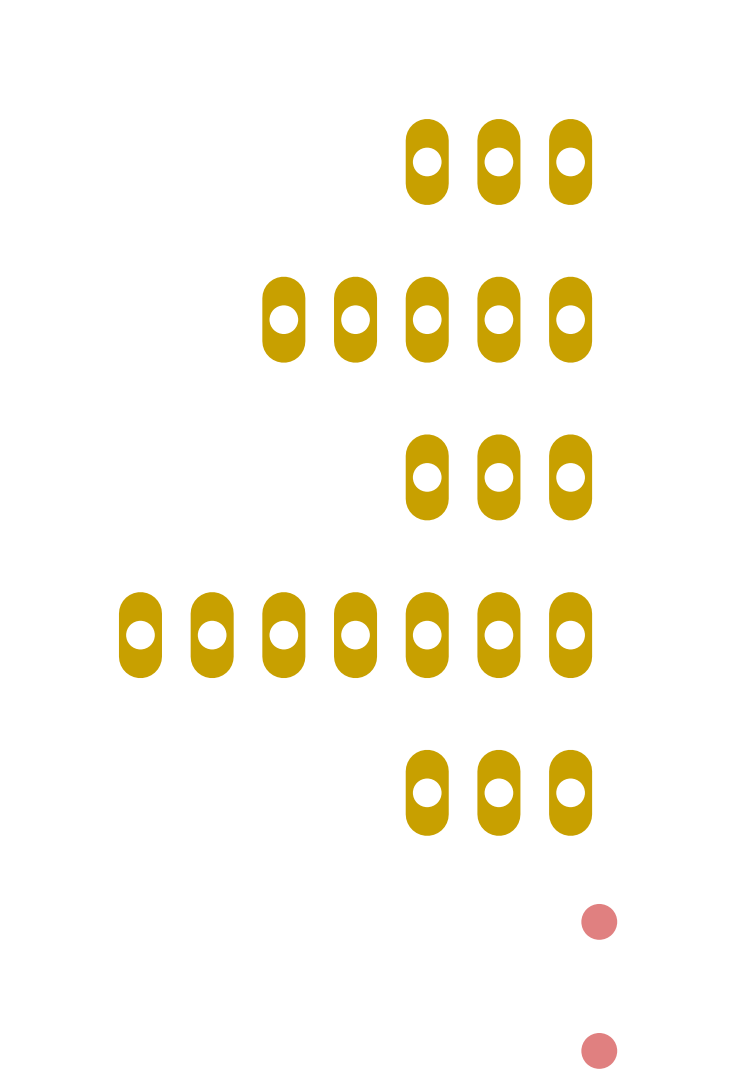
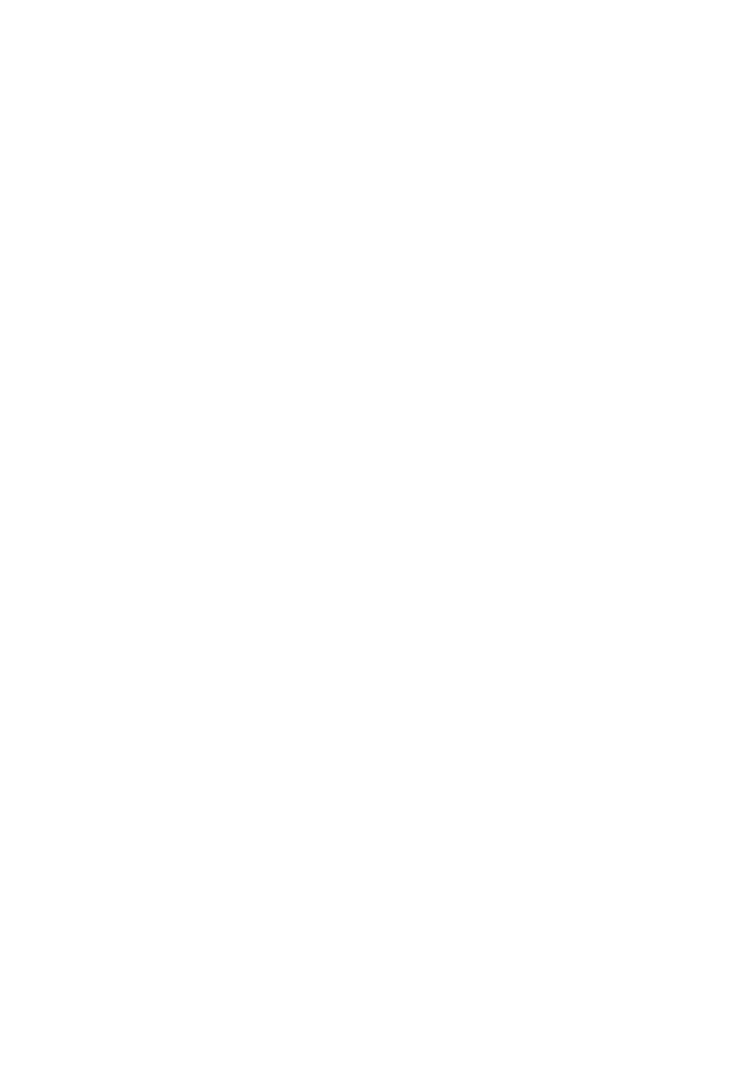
part: (498, 161) -> none
part: (427, 319) -> none
part: (498, 477) -> none
part: (355, 635) -> none
part: (498, 792) -> none
part: (599, 921) -> none
part: (599, 1050) -> none

